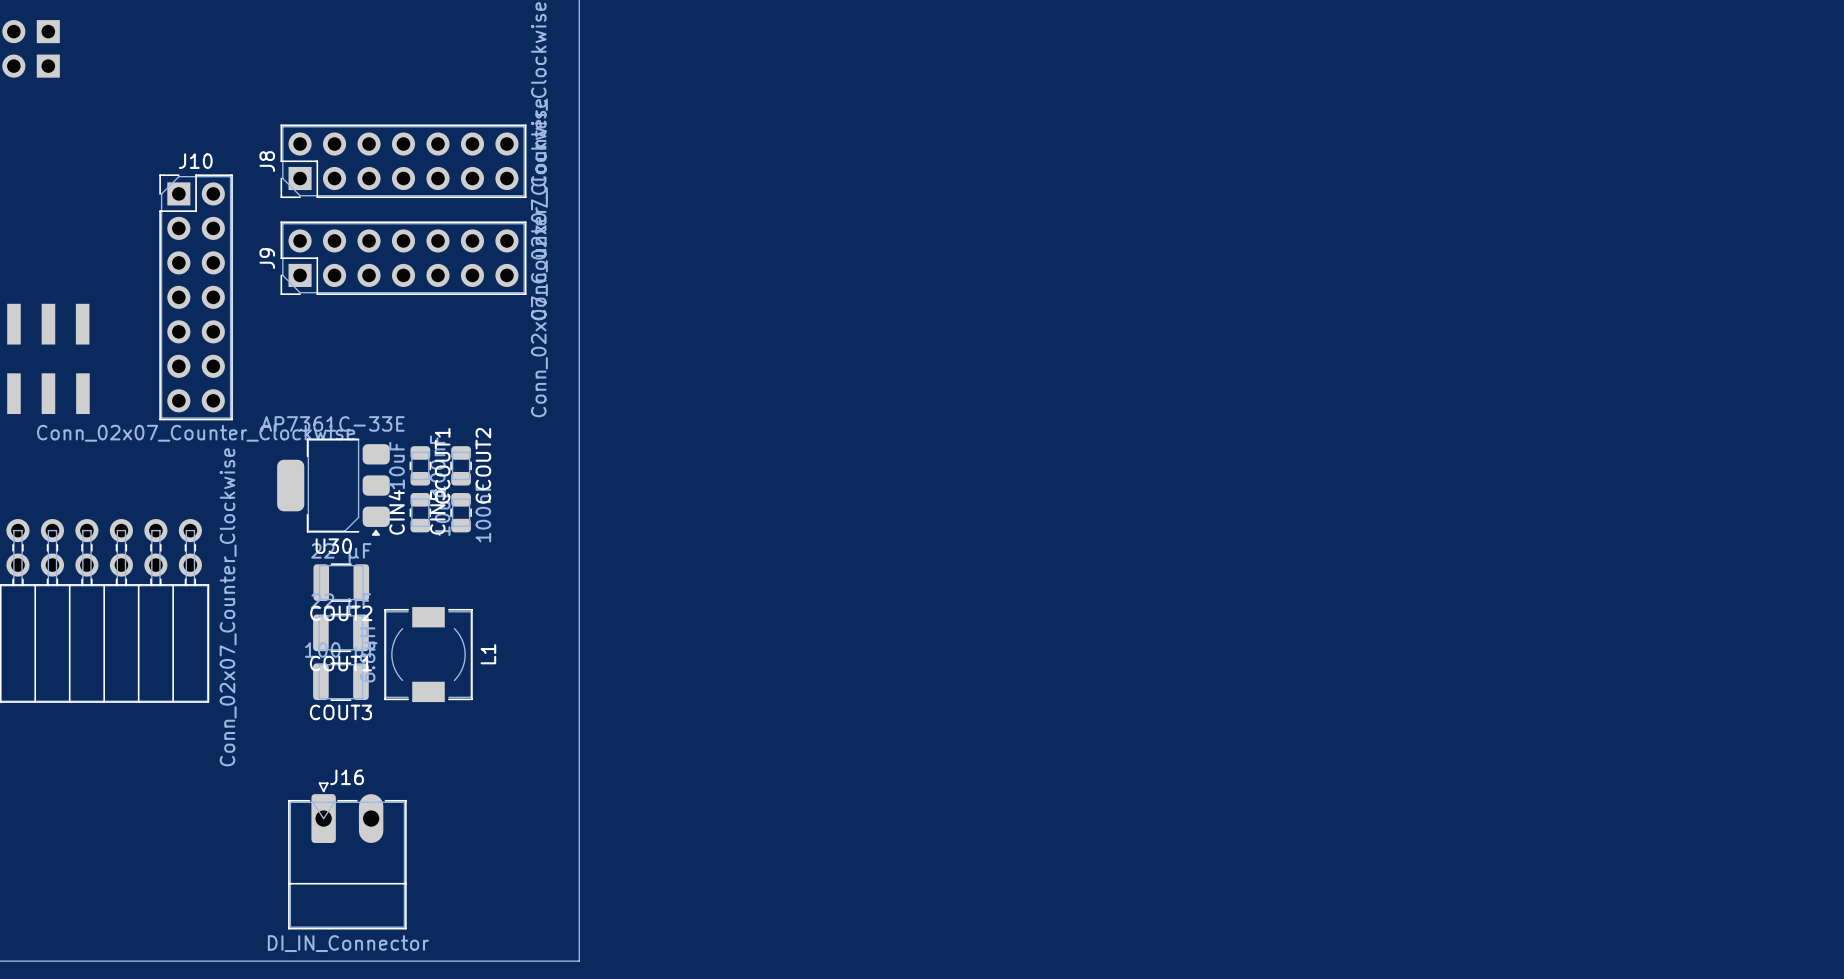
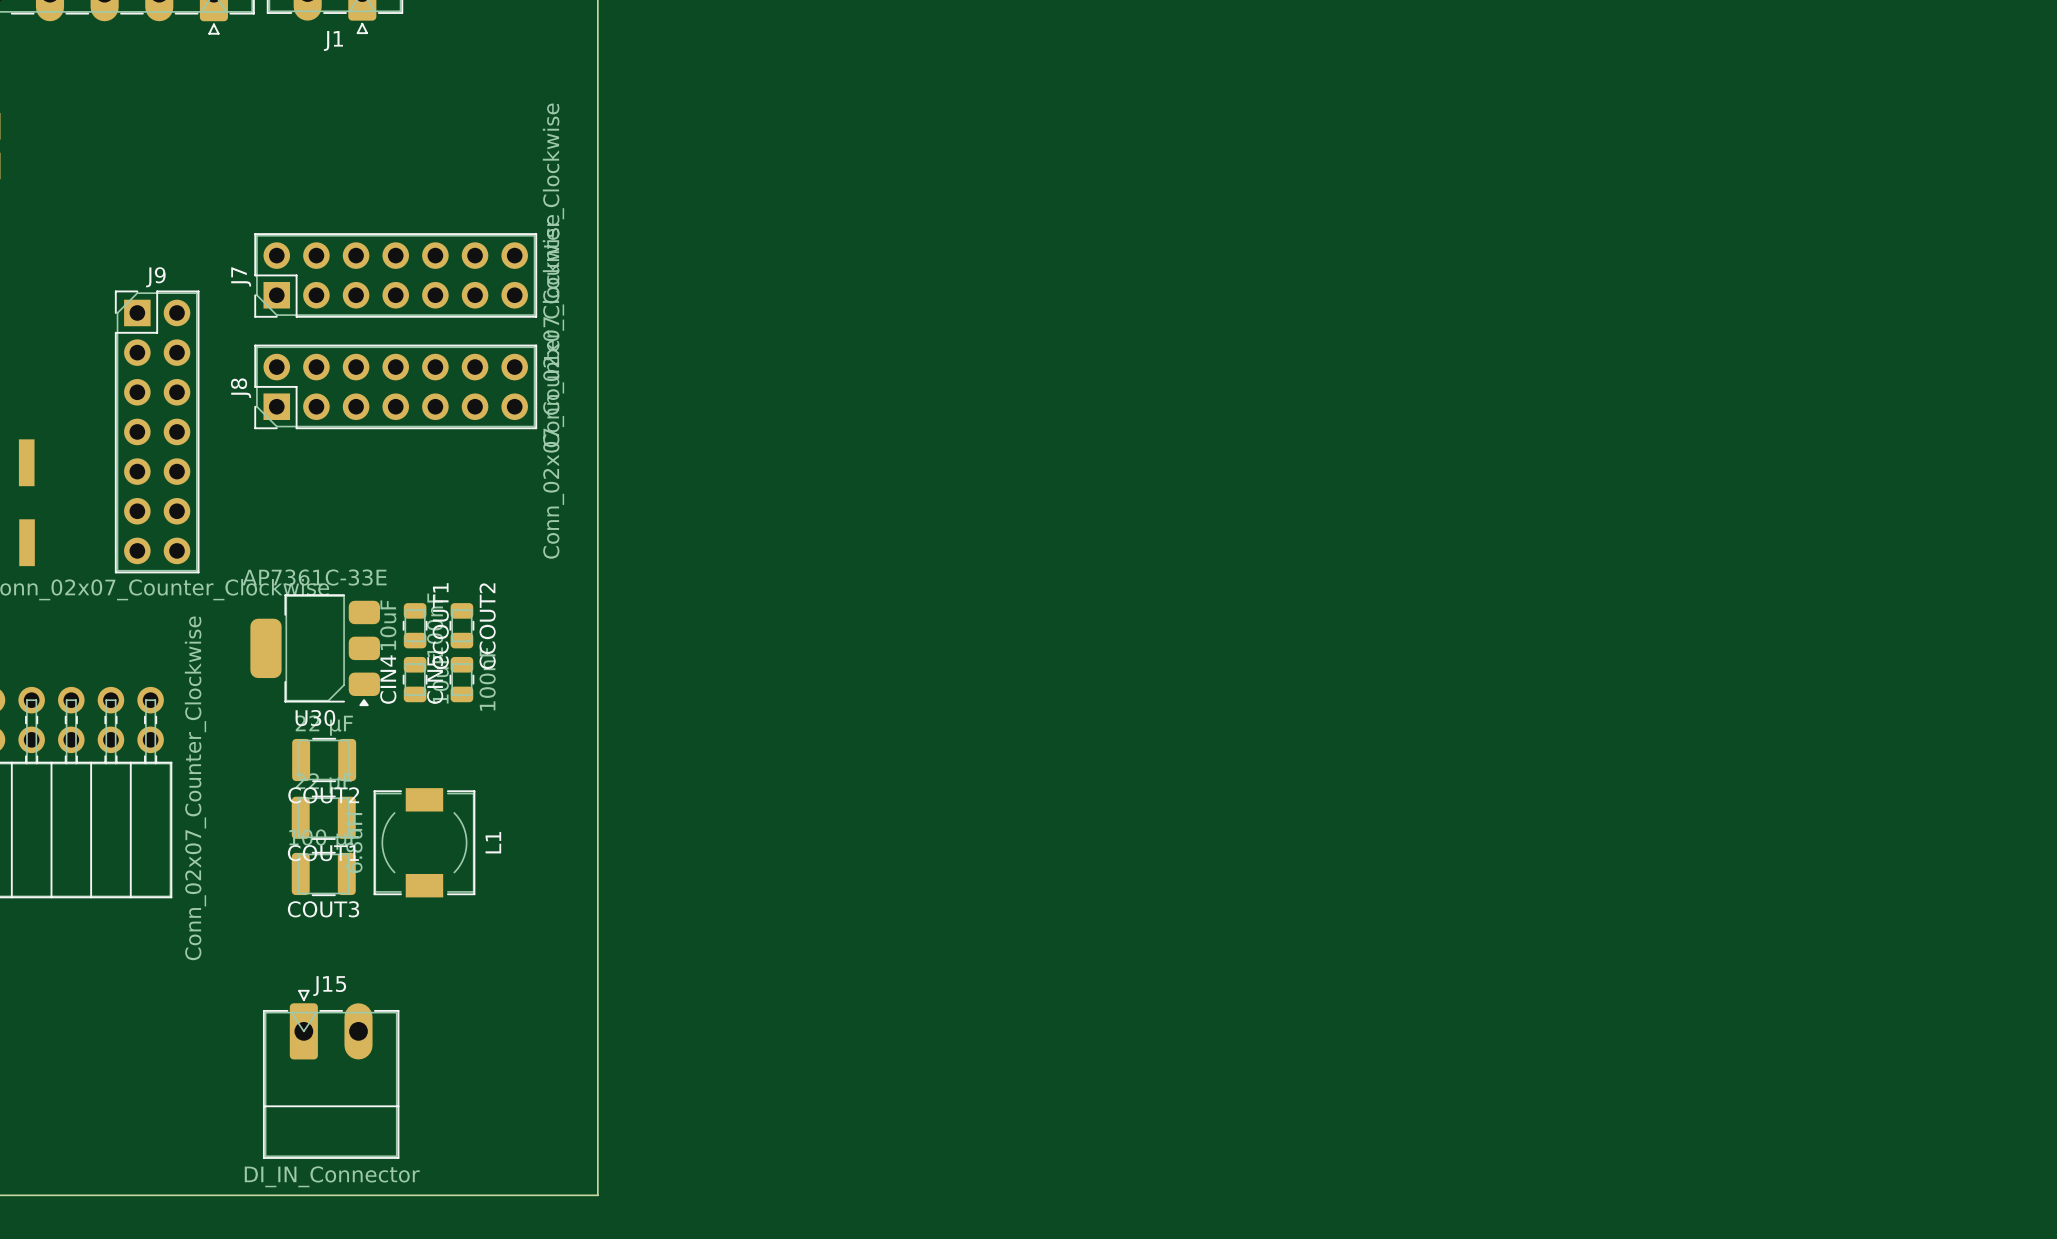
J10 name: J10 (195, 161) -> J9 (155, 277)
J8 name: J8 (267, 161) -> J7 (241, 276)
J9 name: J9 (267, 258) -> J8 (241, 388)
J16 name: J16 (347, 777) -> J15 (329, 986)

